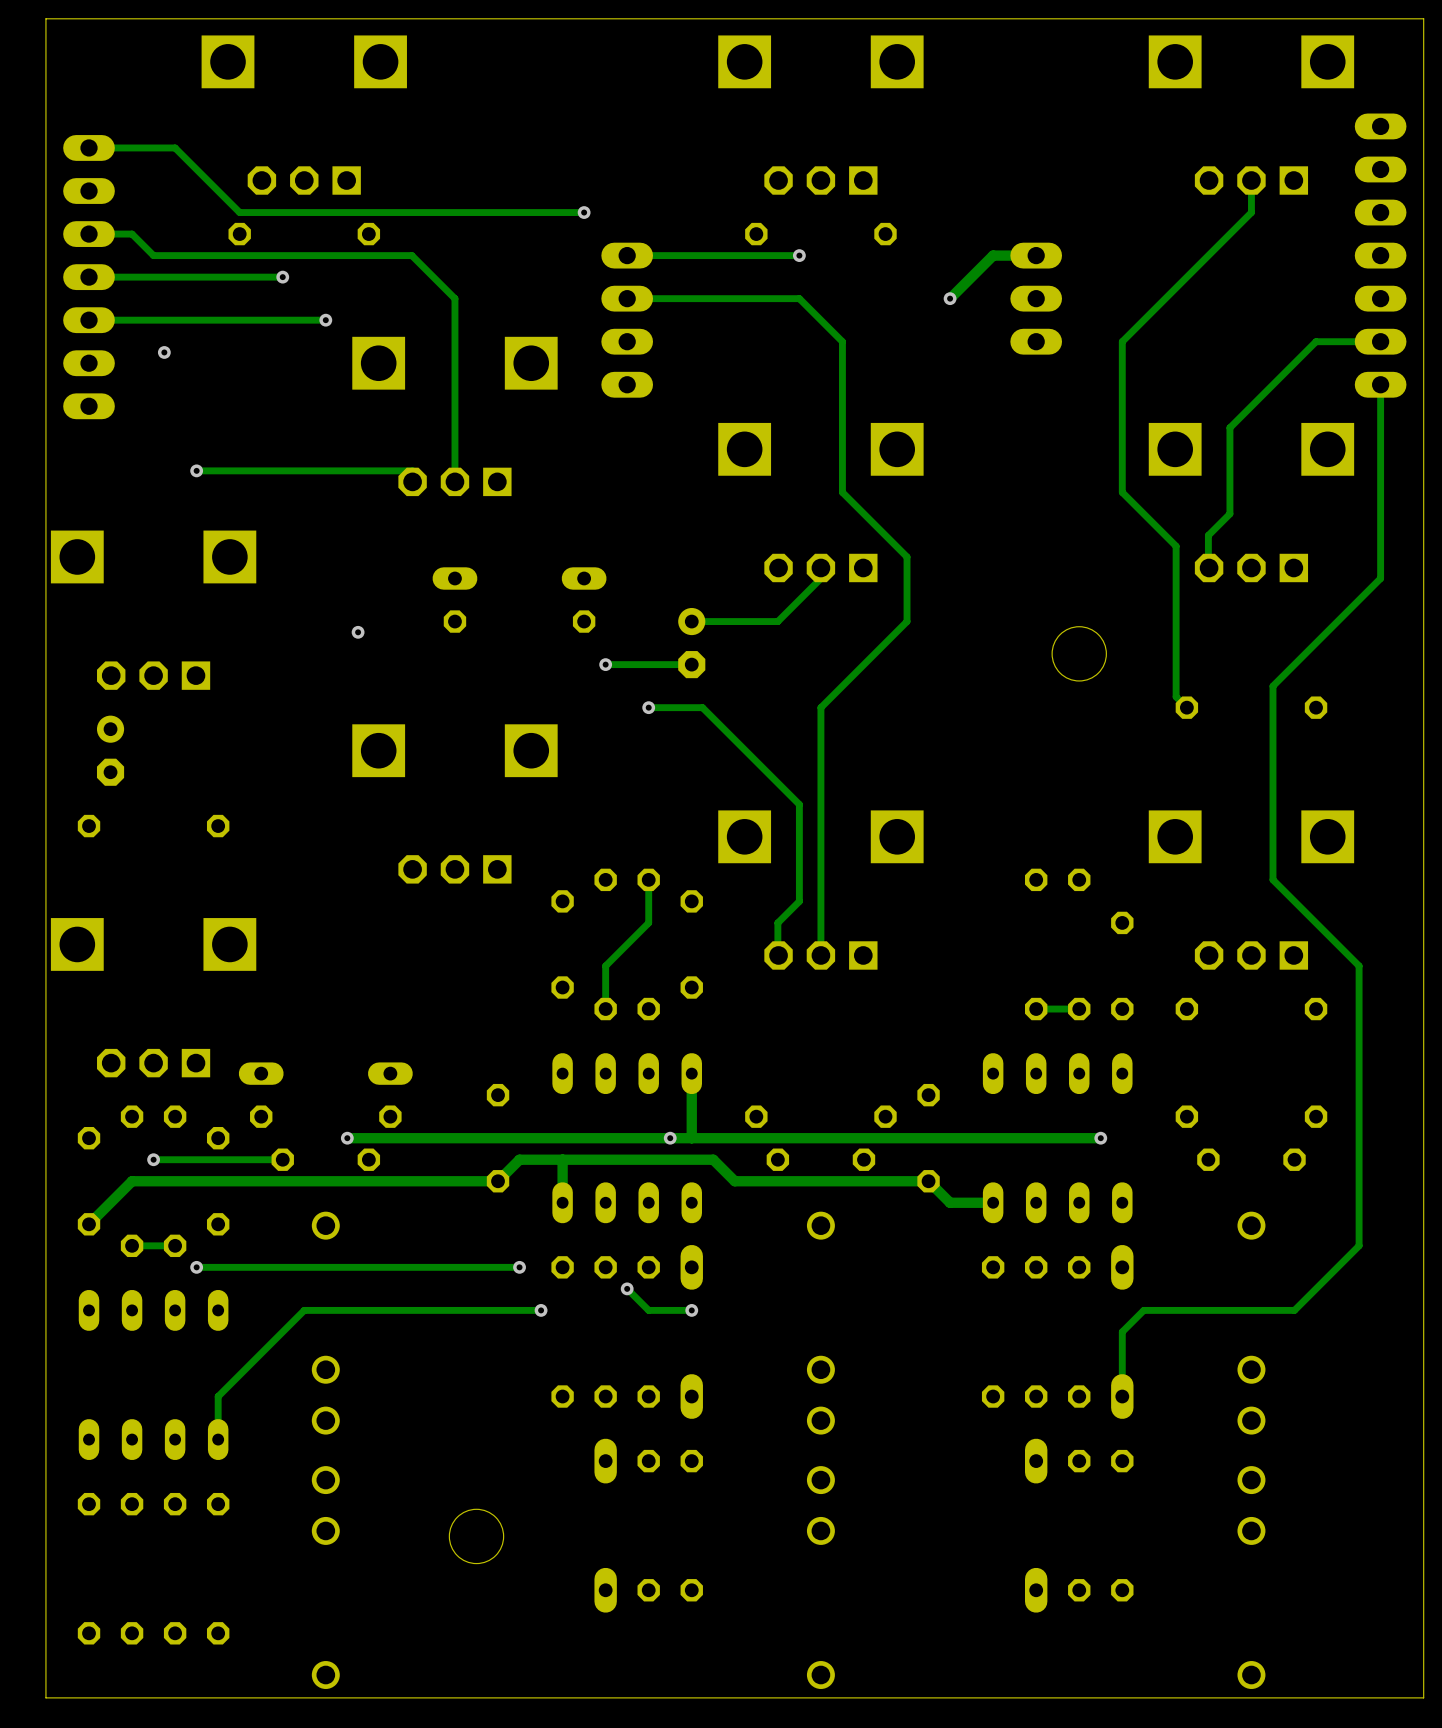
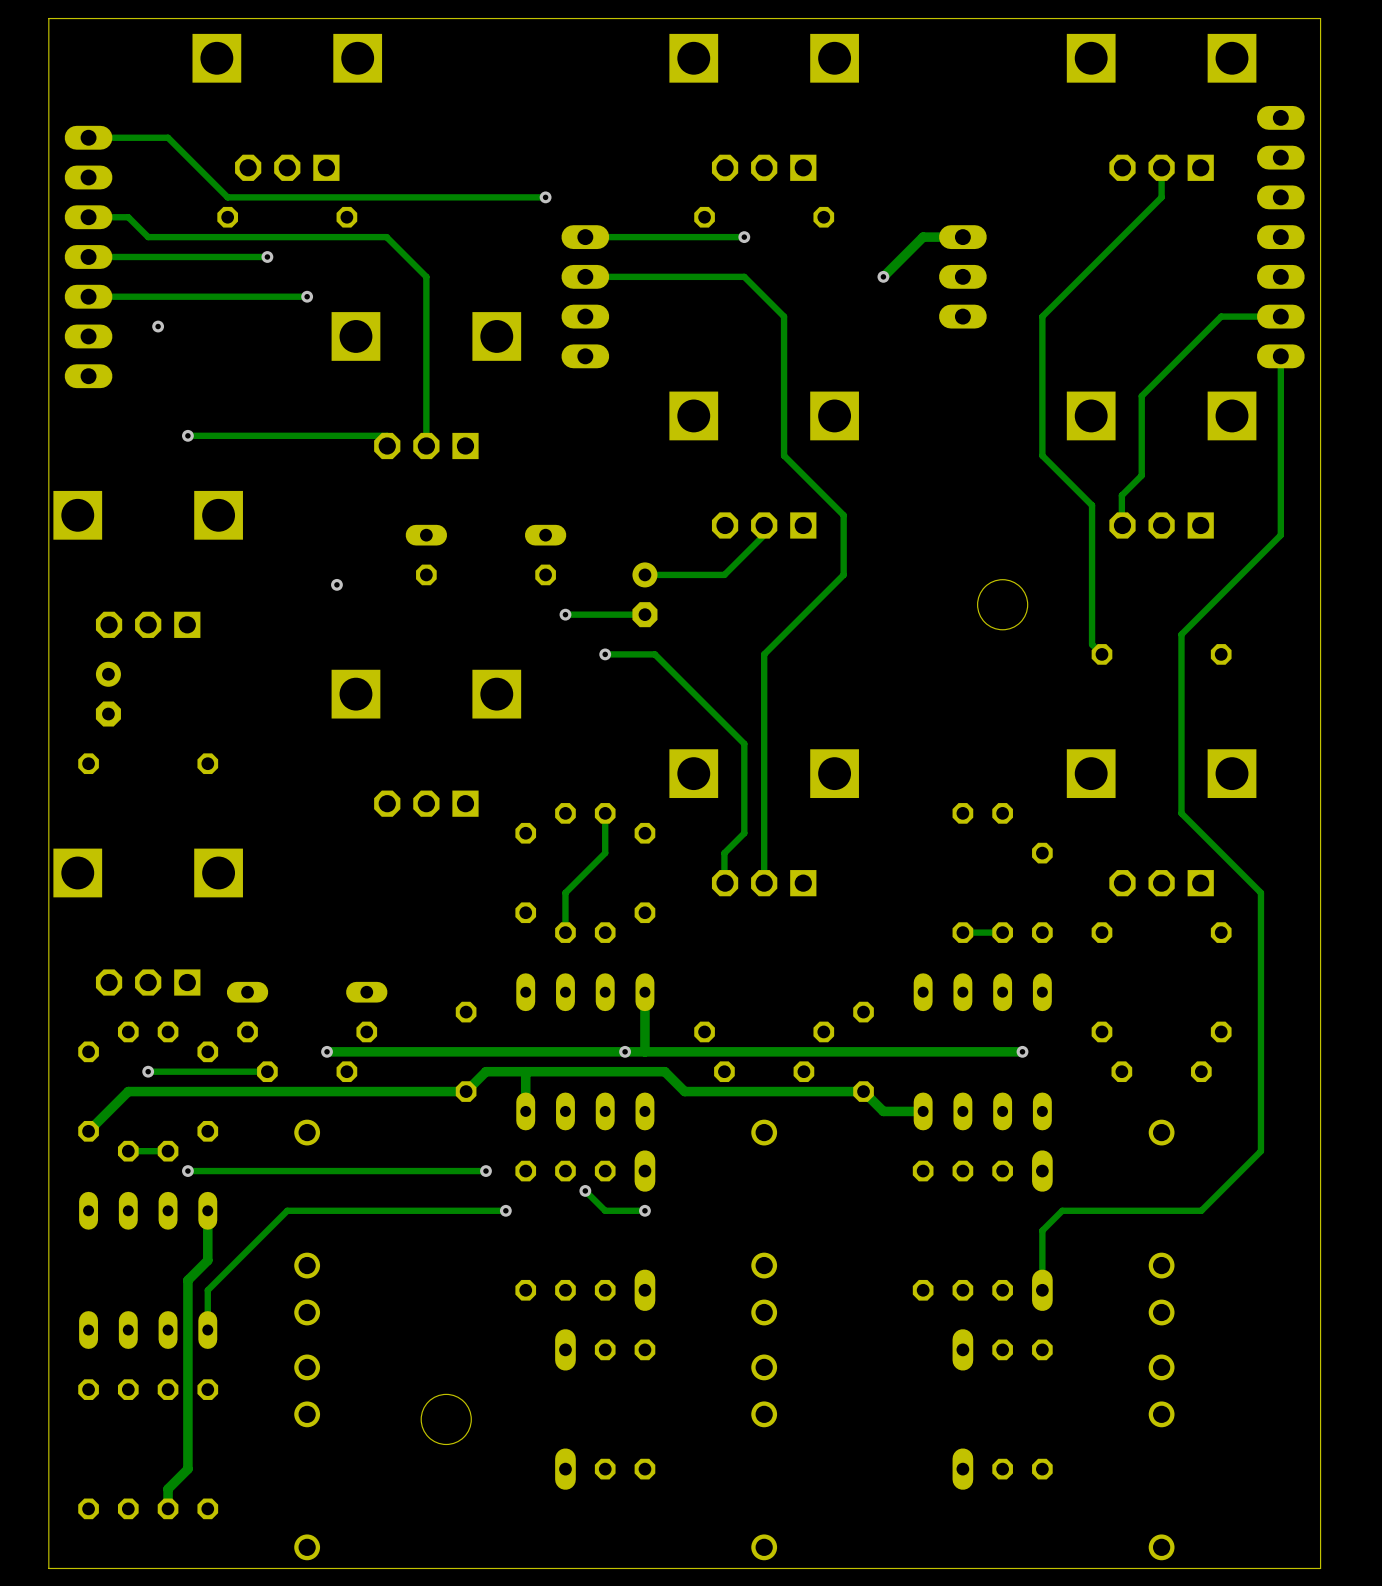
track: none -> (207, 1210) (207, 1260) (187, 1280) (187, 1469) (168, 1488) (168, 1508)

